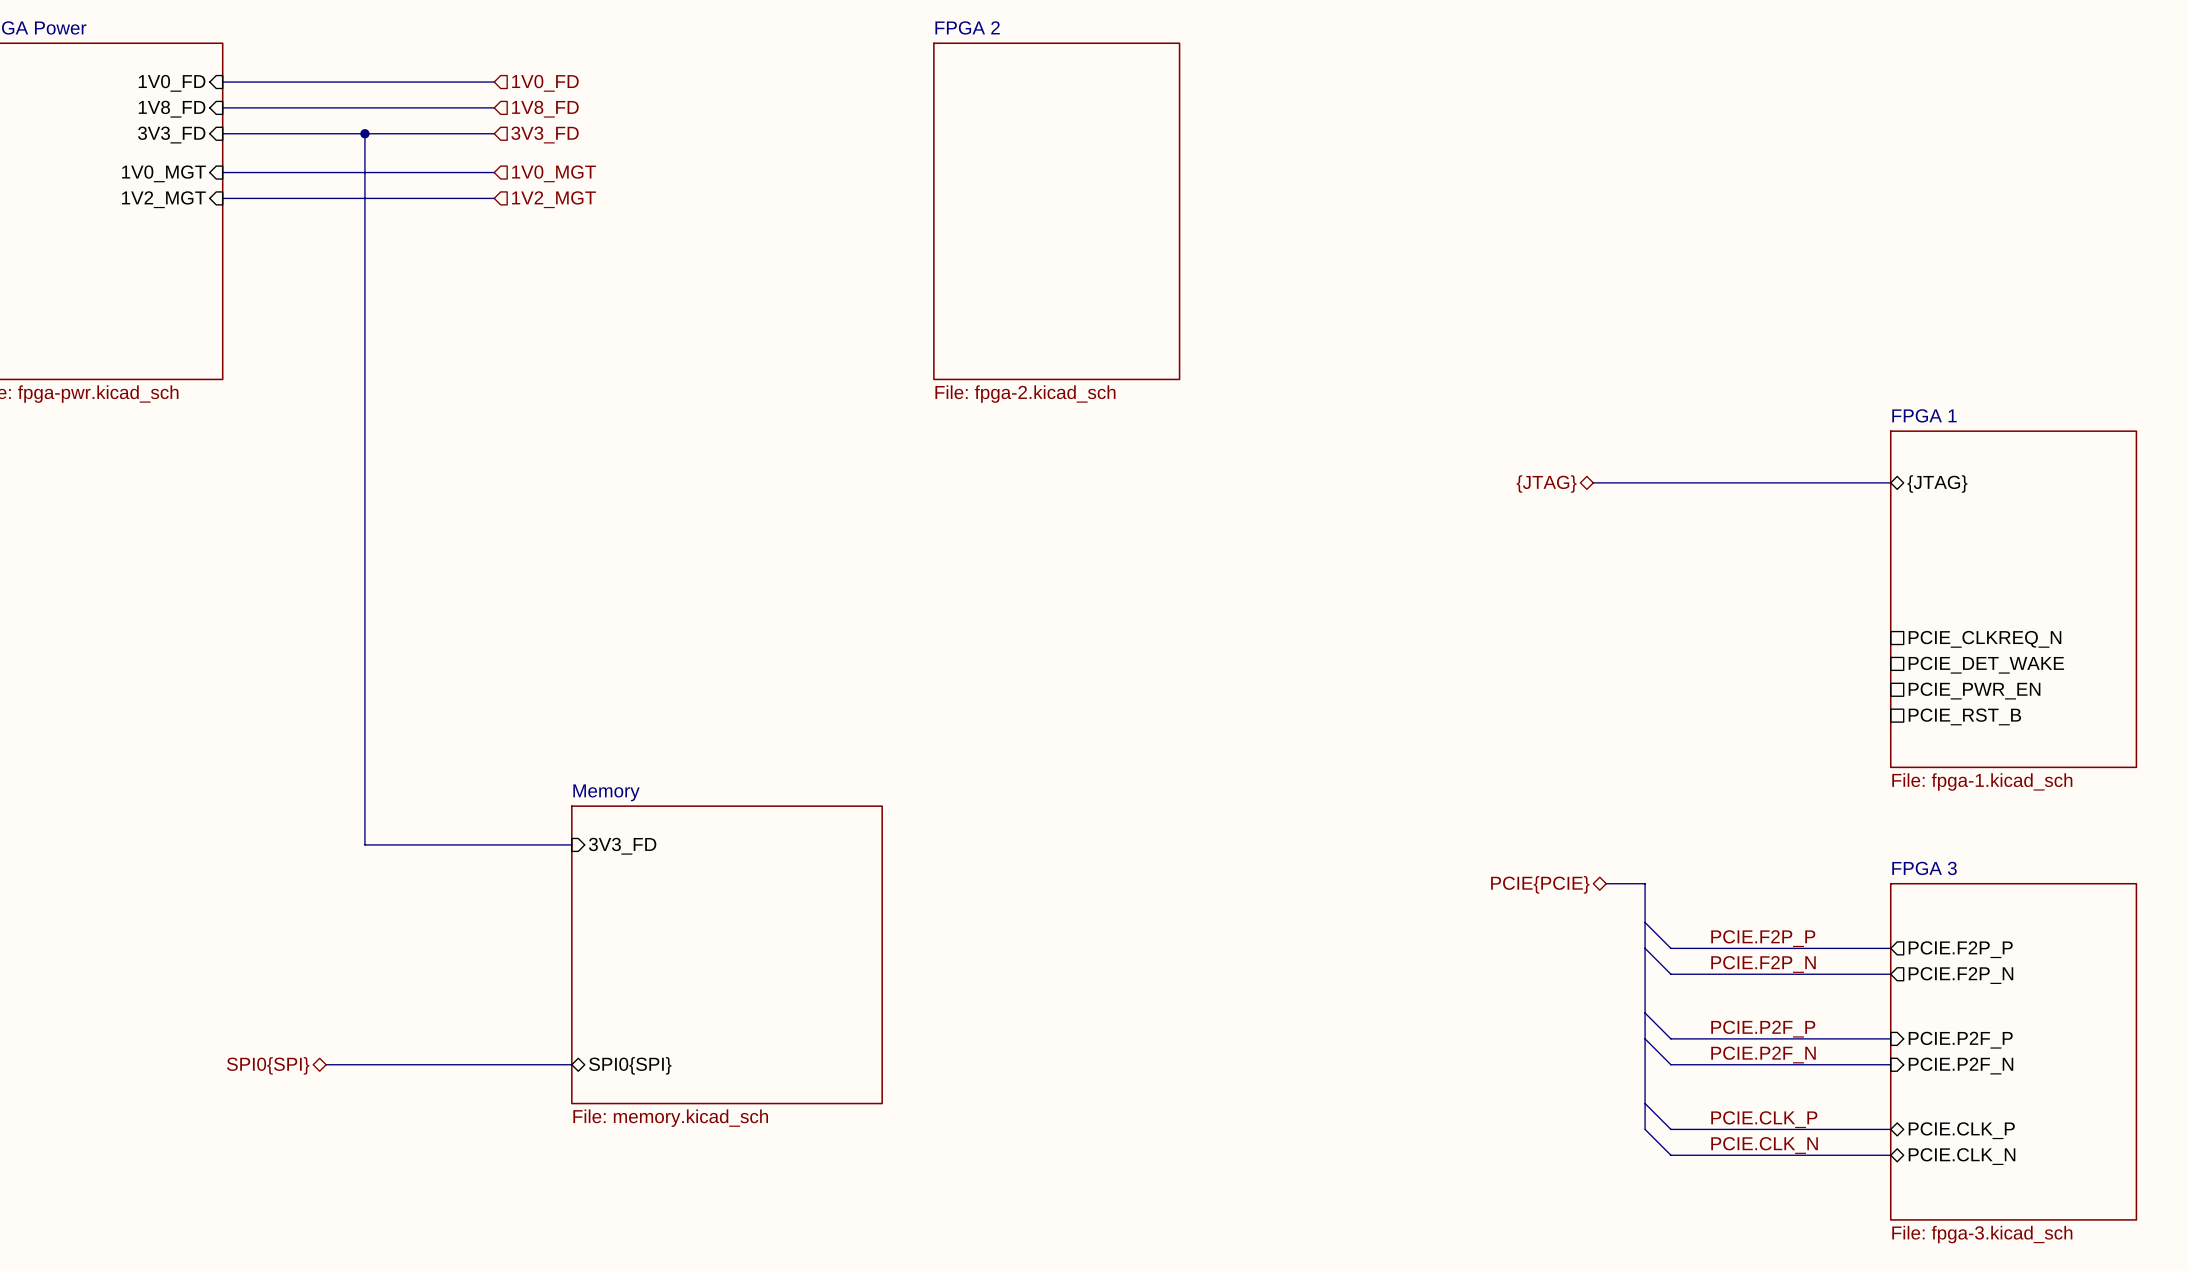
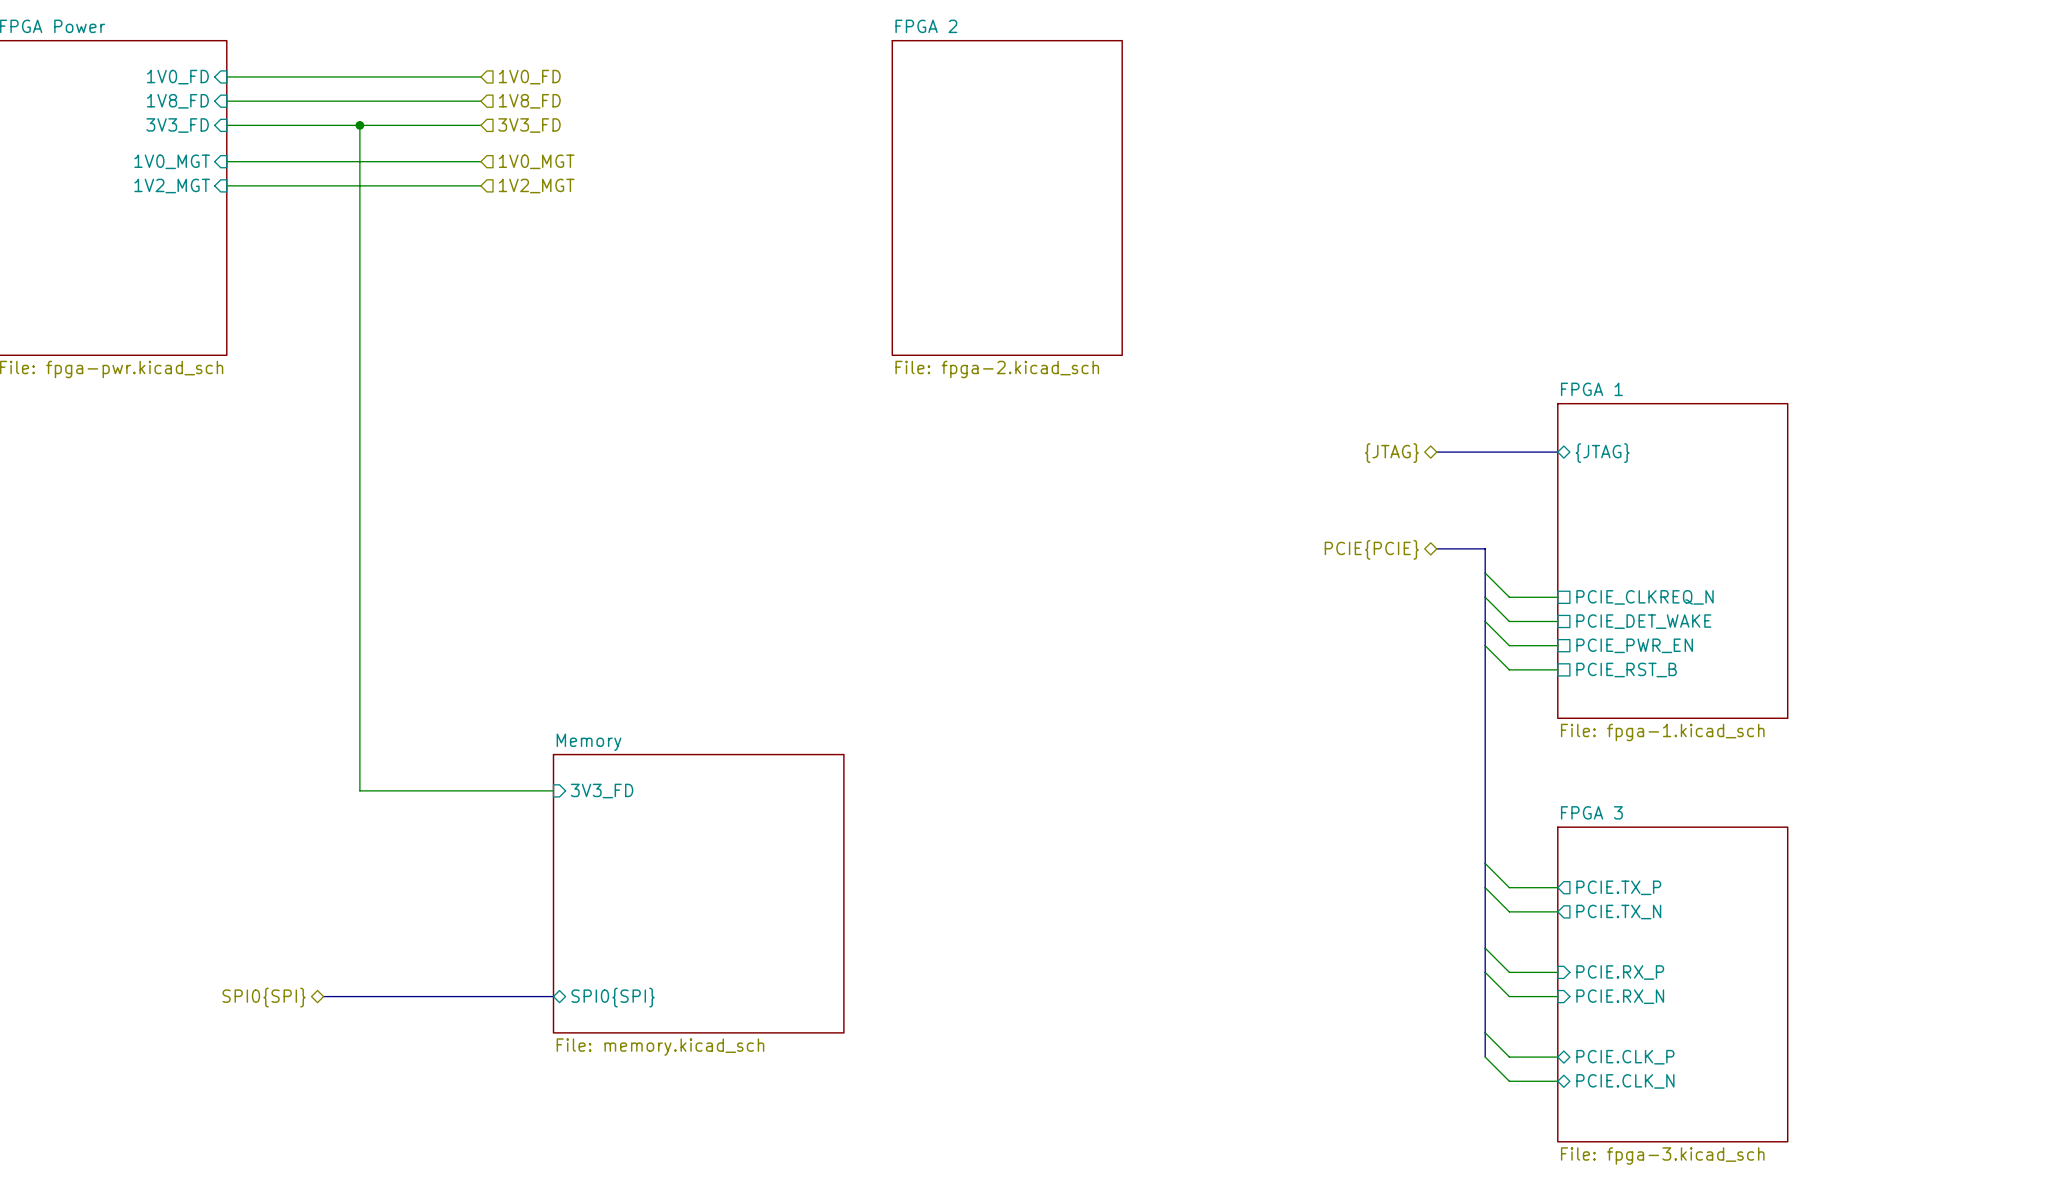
bus: none -> (1436, 452) (1509, 452)
bus: (1645, 482) (1890, 482) -> none
hierarchical label position: {JTAG} (1546, 484) -> {JTAG} (1391, 453)
sheet pin position: {JTAG} (1937, 484) -> {JTAG} (1602, 453)
bus: none -> (1436, 548) (1485, 548) (1485, 1057)
hierarchical label: none -> PCIE{PCIE} (1371, 549)
sheet FPGA 1 position: (2013, 599) -> (1672, 560)
wire: none -> (1485, 573) (1509, 597) (1557, 597)
wire: none -> (1485, 597) (1509, 621) (1557, 621)
sheet pin position: PCIE_CLKREQ_N (1984, 639) -> PCIE_CLKREQ_N (1644, 597)
wire: none -> (1485, 621) (1509, 645) (1557, 645)
sheet pin position: PCIE_DET_WAKE (1986, 665) -> PCIE_DET_WAKE (1643, 621)
wire: none -> (1485, 645) (1509, 669) (1557, 669)
sheet pin position: PCIE_PWR_EN (1974, 691) -> PCIE_PWR_EN (1634, 645)
sheet pin position: PCIE_RST_B (1964, 716) -> PCIE_RST_B (1626, 670)
bus: (1606, 883) (1645, 883) (1645, 1129) -> none
hierarchical label: PCIE{PCIE} (1540, 884) -> none
wire: (1645, 922) (1670, 948) (1890, 948) -> none
label: PCIE.F2P_P (1763, 938) -> none
wire: none -> (1485, 887) (1509, 911) (1557, 911)
wire: (1645, 948) (1670, 974) (1890, 974) -> (1557, 887) (1509, 887) (1485, 863)
sheet pin: none -> PCIE.TX_P (1618, 887)
sheet pin: PCIE.F2P_P (1960, 949) -> none
label: PCIE.F2P_N (1763, 964) -> none
sheet pin: none -> PCIE.TX_N (1618, 912)
sheet pin: PCIE.F2P_N (1960, 975) -> none
wire: (1645, 1013) (1670, 1038) (1890, 1038) -> none
label: PCIE.P2F_P (1763, 1029) -> none
wire: none -> (1485, 972) (1509, 996) (1557, 996)
wire: (1645, 1038) (1670, 1064) (1890, 1064) -> (1557, 972) (1509, 972) (1485, 948)
sheet pin: none -> PCIE.RX_P (1620, 972)
sheet pin: PCIE.P2F_P (1960, 1040) -> none
sheet FPGA 3 position: (2013, 1051) -> (1672, 984)
label: PCIE.P2F_N (1763, 1054) -> none
sheet pin: none -> PCIE.RX_N (1620, 996)
sheet pin: PCIE.P2F_N (1960, 1066) -> none
wire: (1645, 1103) (1670, 1129) (1890, 1129) -> none
label: PCIE.CLK_P (1764, 1119) -> none
wire: none -> (1485, 1057) (1509, 1081) (1557, 1081)
wire: (1645, 1129) (1670, 1155) (1890, 1155) -> (1557, 1057) (1509, 1057) (1485, 1032)
sheet pin position: PCIE.CLK_P (1961, 1130) -> PCIE.CLK_P (1625, 1057)
label: PCIE.CLK_N (1764, 1145) -> none
sheet pin position: PCIE.CLK_N (1962, 1156) -> PCIE.CLK_N (1625, 1081)

